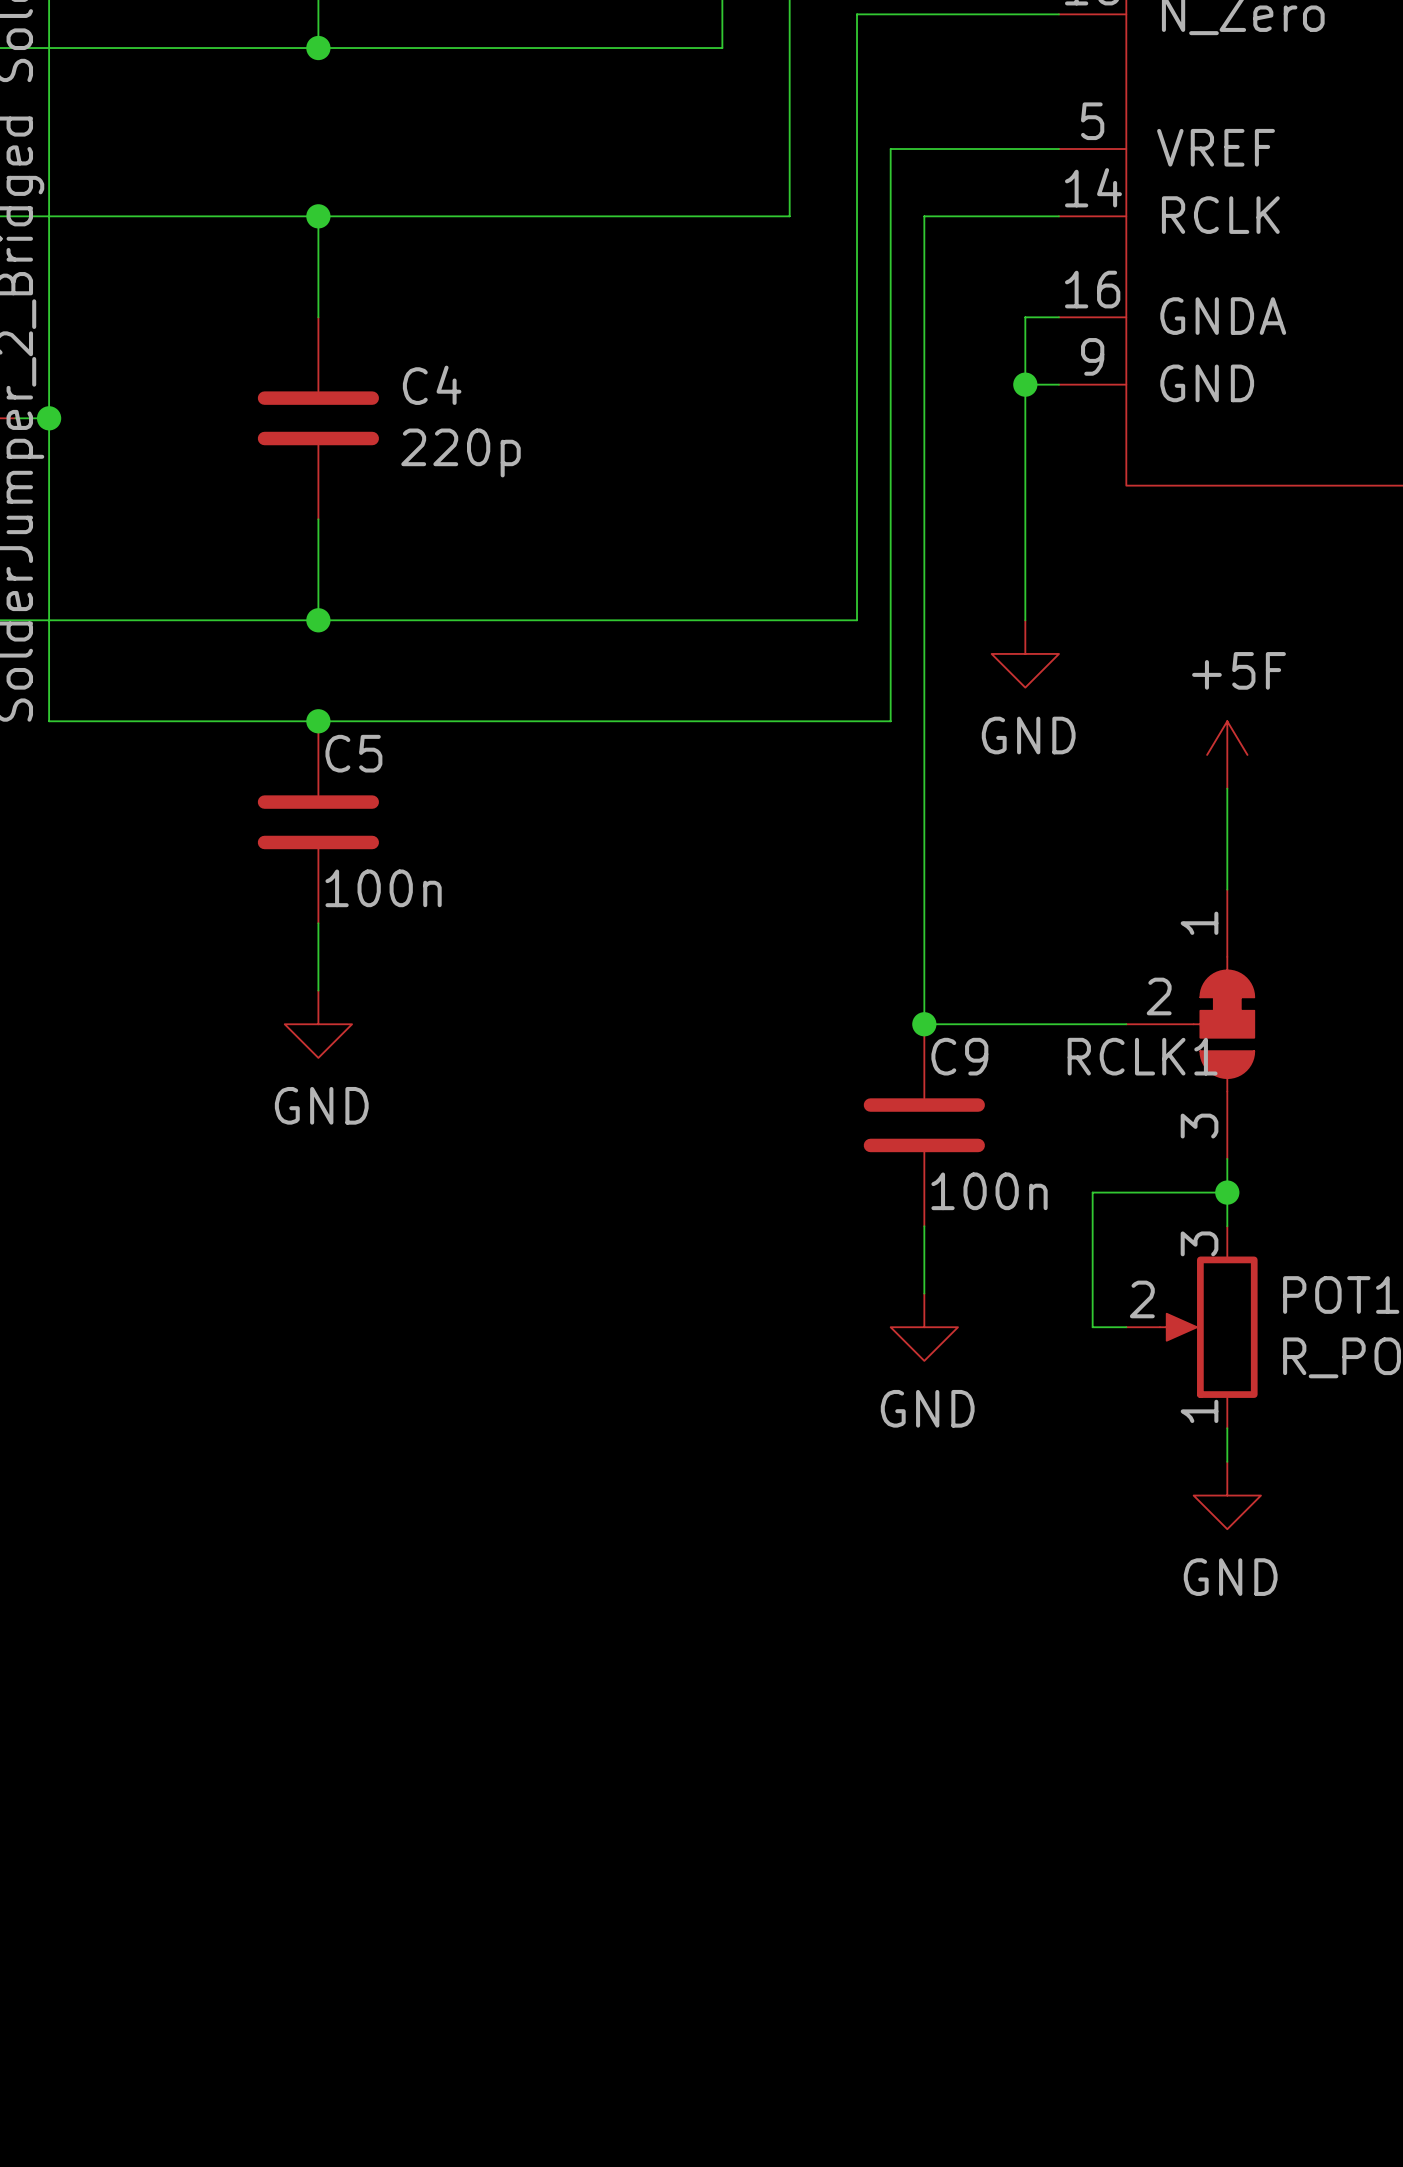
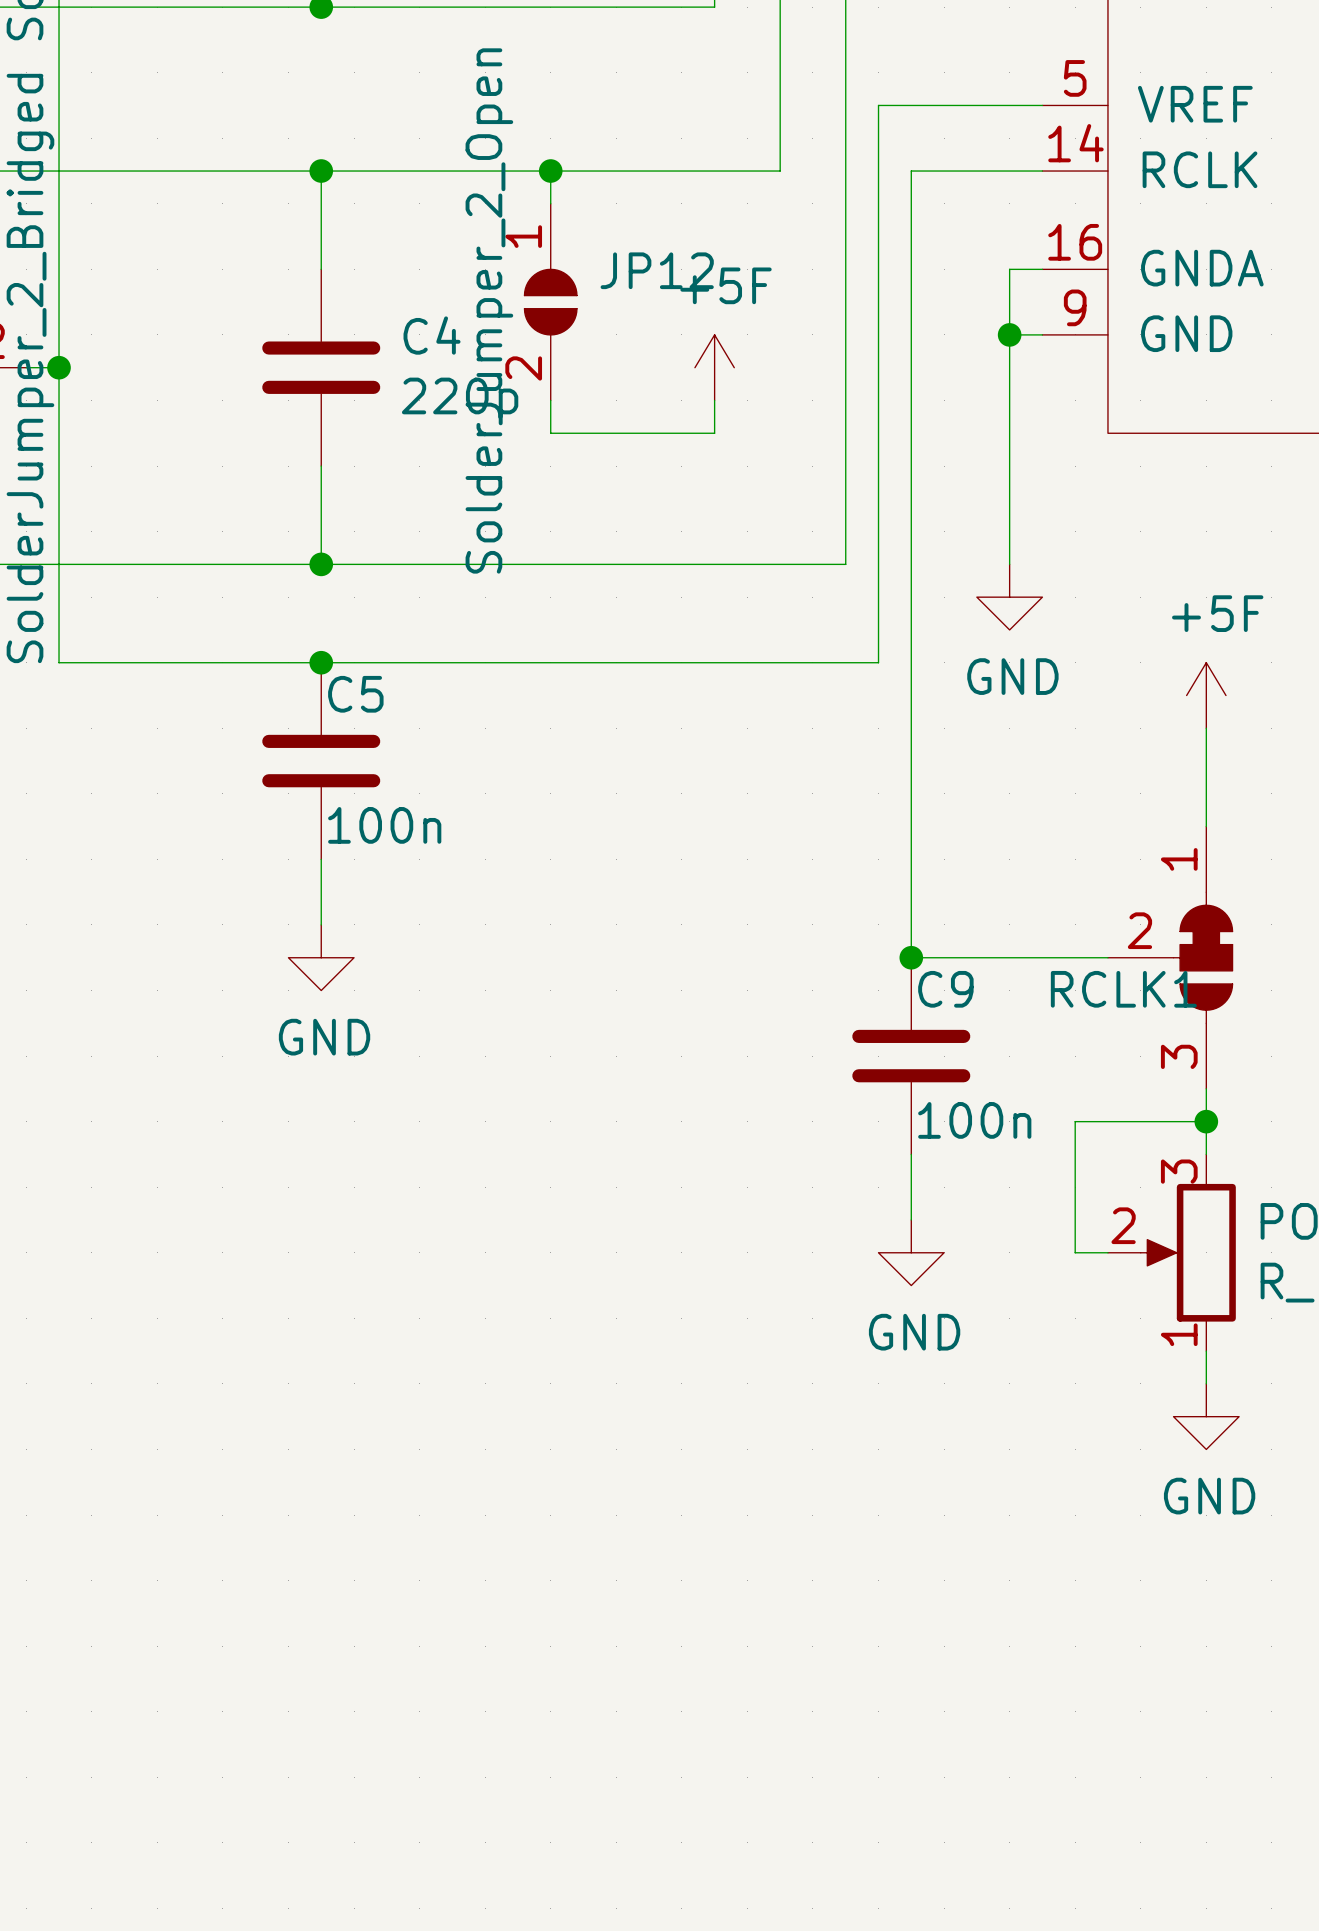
wire: none -> (550, 171) (550, 203)
junction: none -> (550, 171)
JP12: none -> SolderJumper_2_Open (550, 302)
power symbol: none -> +5F (714, 367)
wire: none -> (550, 400) (550, 433) (714, 433) (714, 400)

